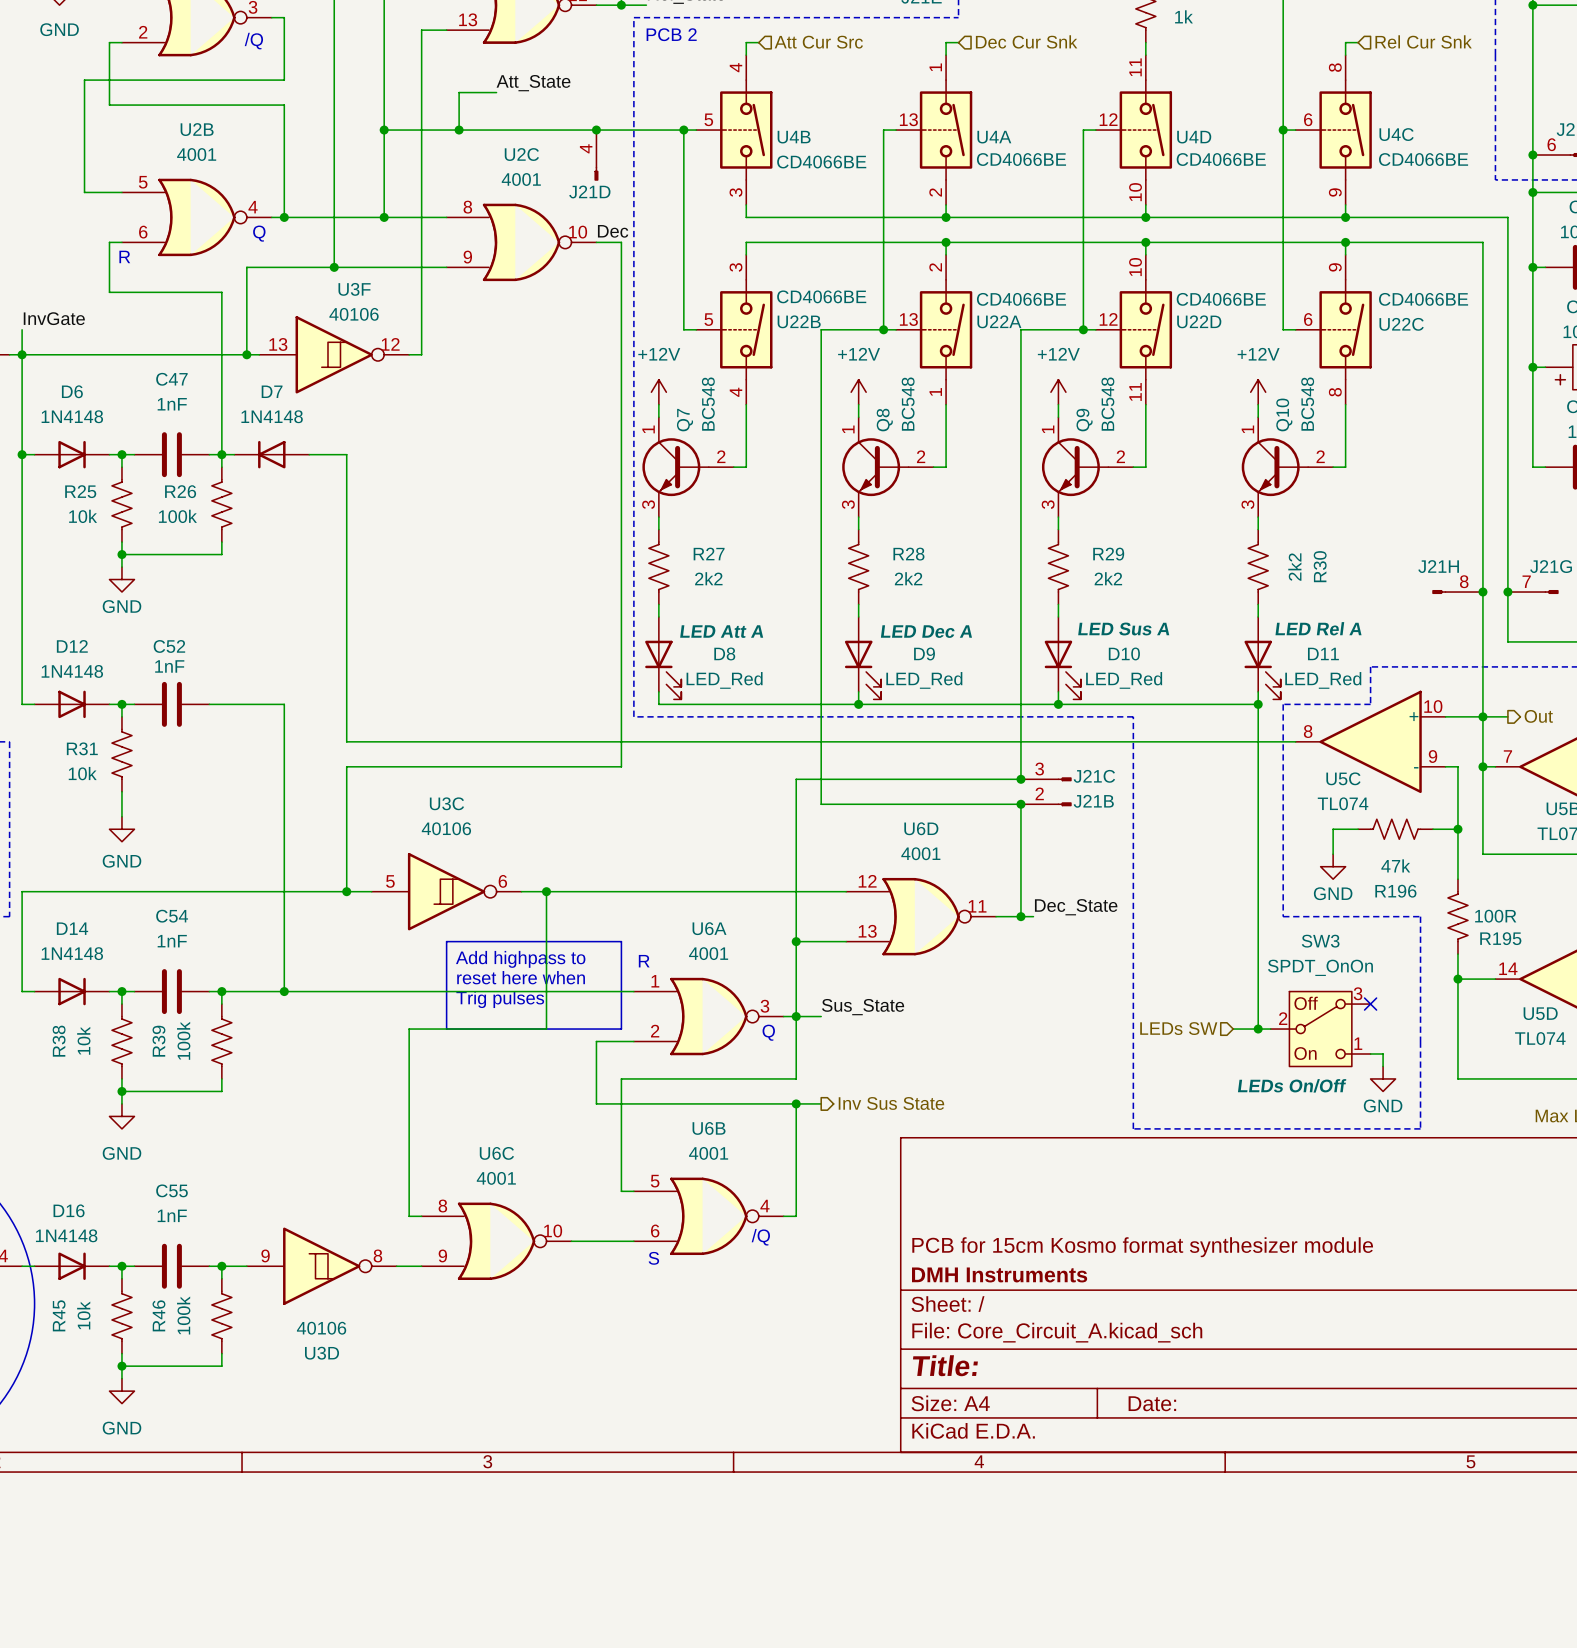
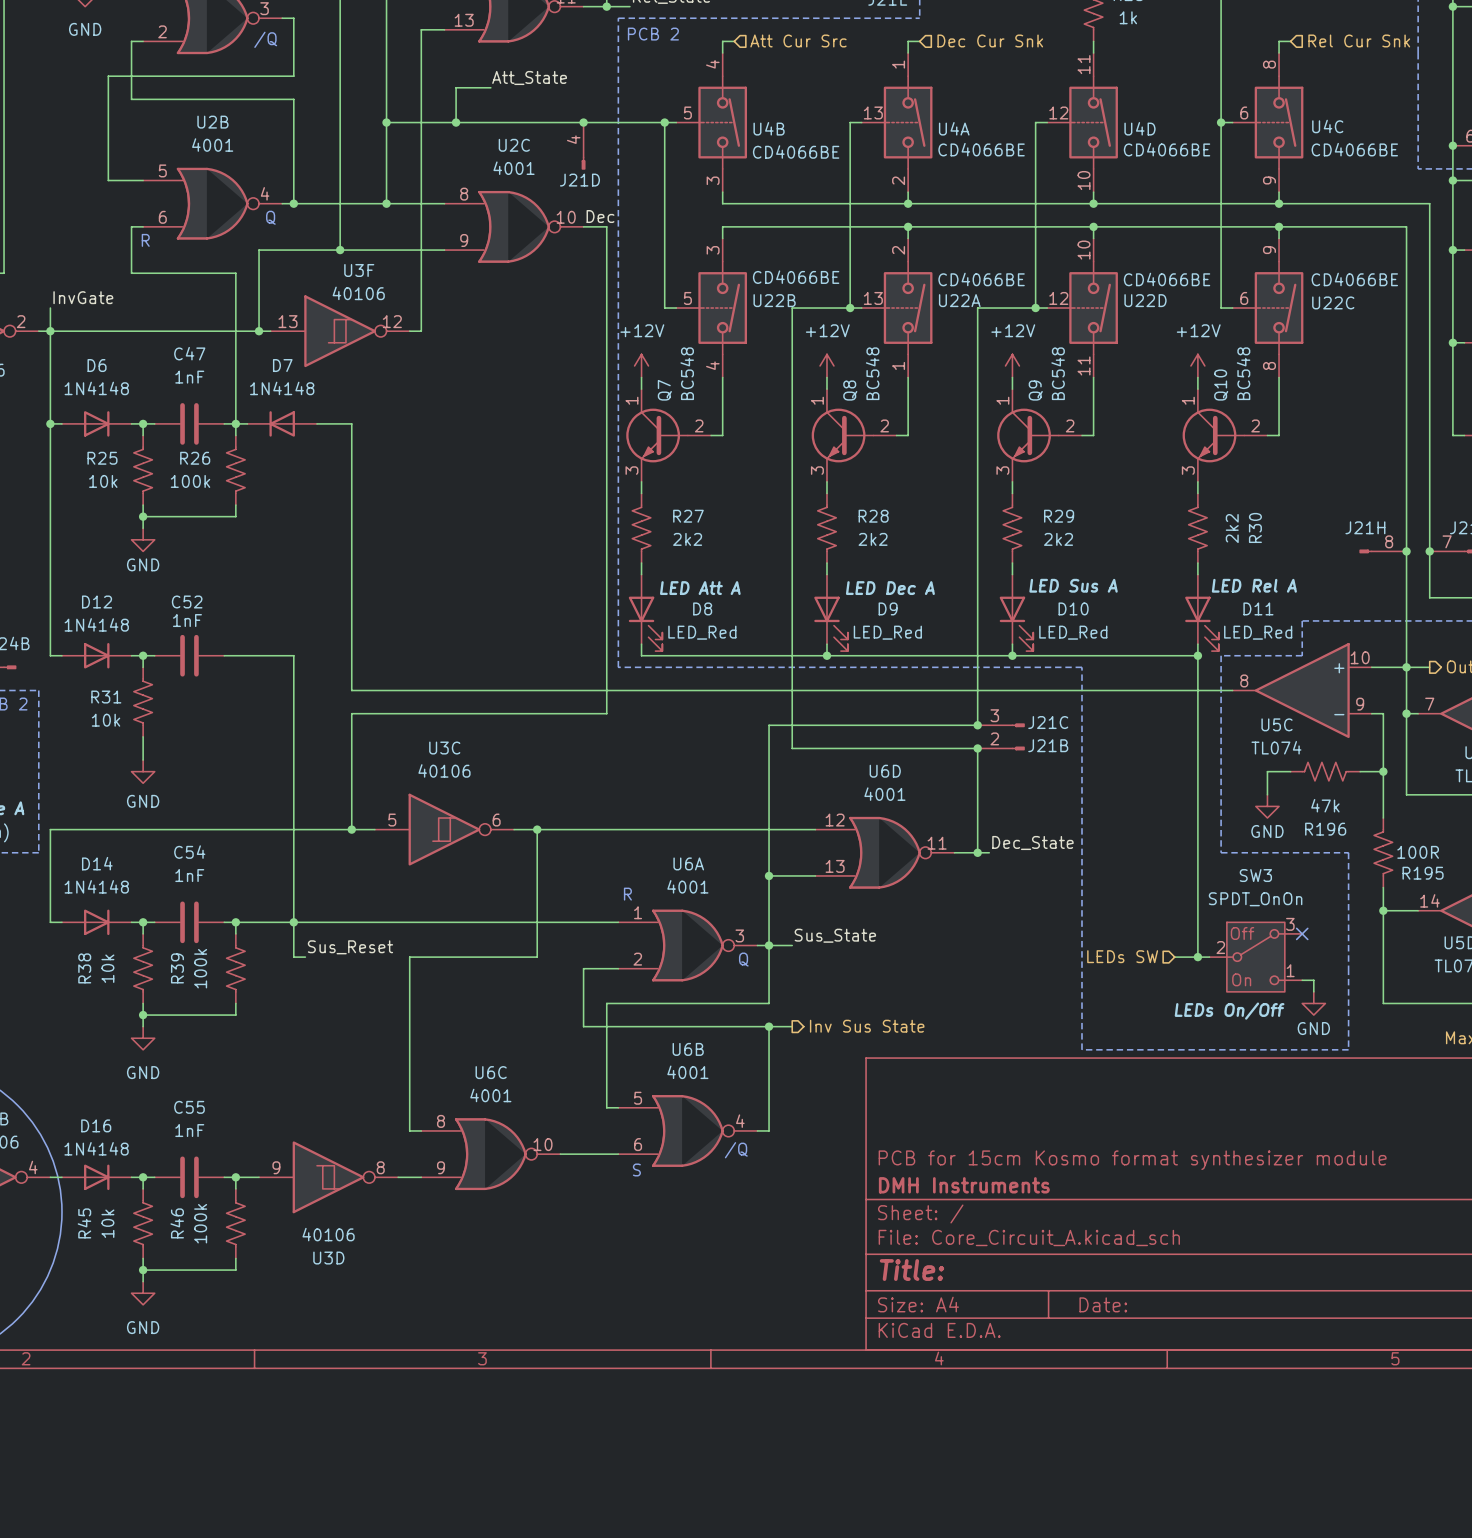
line: (446, 941) (621, 941) (621, 1029) (446, 1029) (446, 941) -> none
text: Add highpass to (520, 959) -> none
text: reset here when (521, 977) -> none
wire: none -> (293, 922) (293, 957) (305, 957)
text: Trig pulses (500, 999) -> none
label: none -> Sus_Reset (350, 947)

